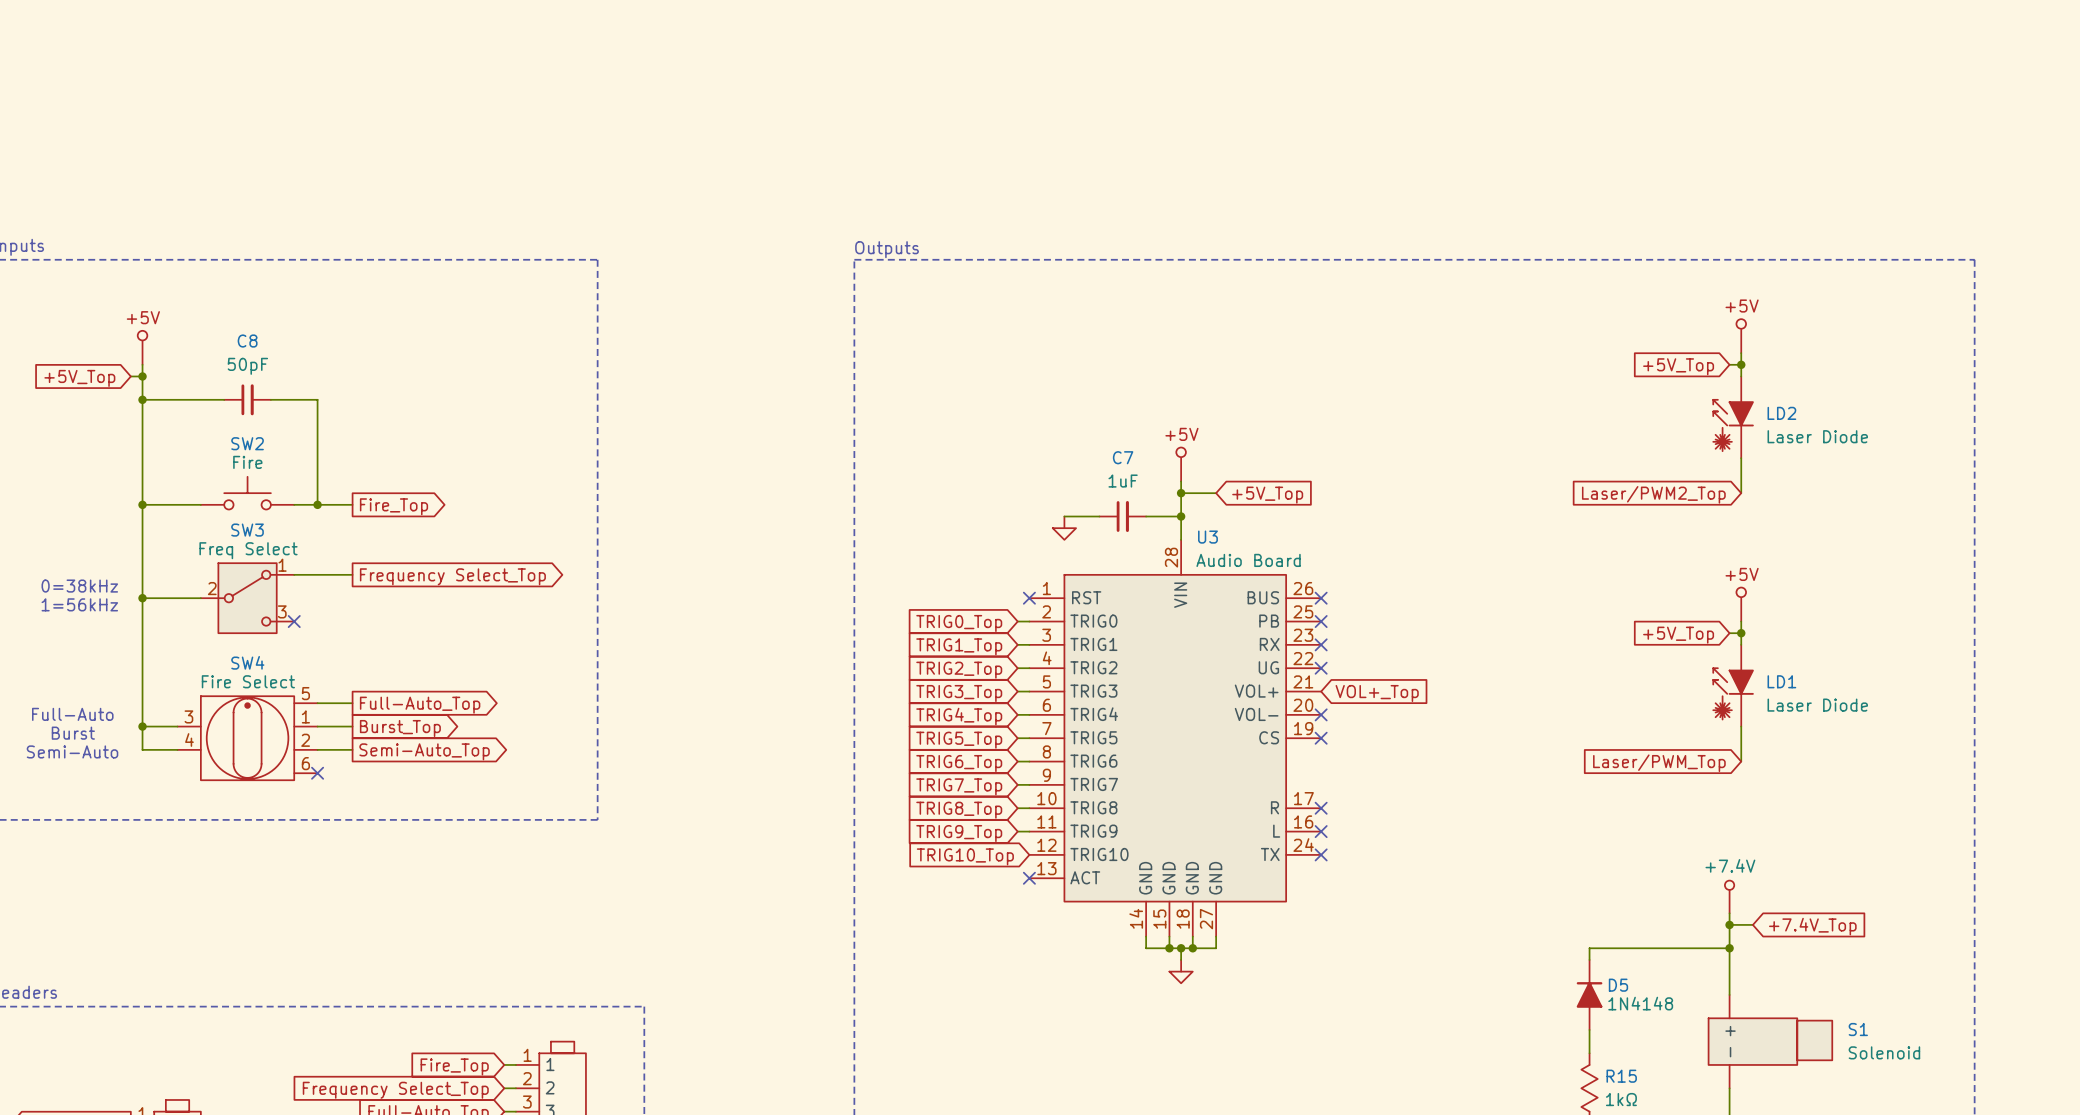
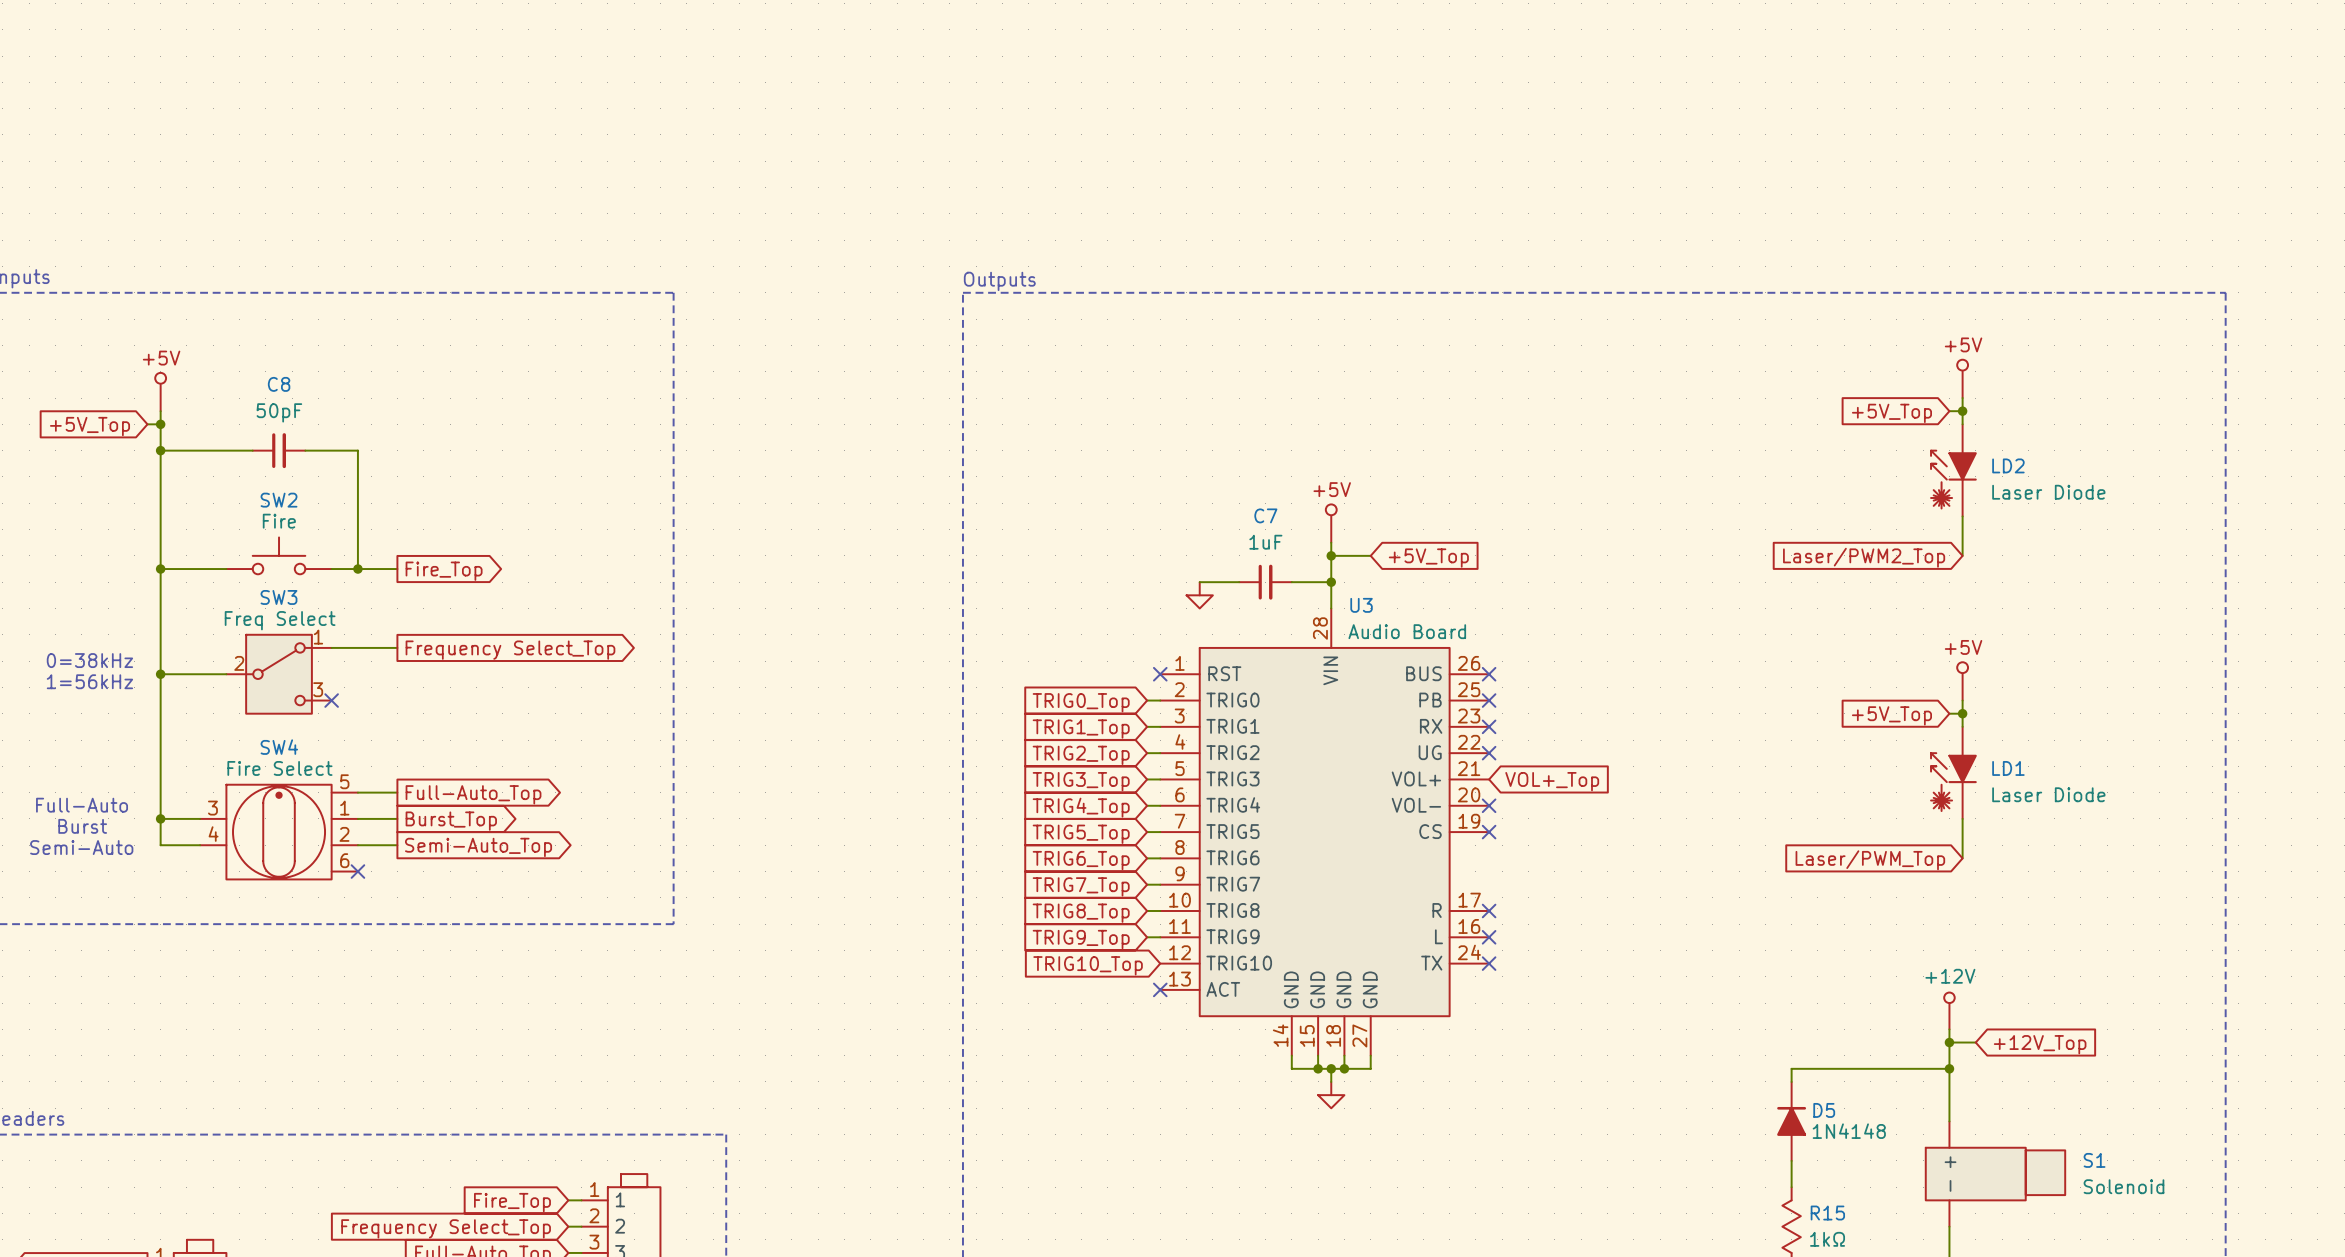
power symbol: +7.4V (1729, 896) -> +12V (1949, 1010)
global label: +7.4V_Top (1812, 926) -> +12V_Top (2040, 1044)

